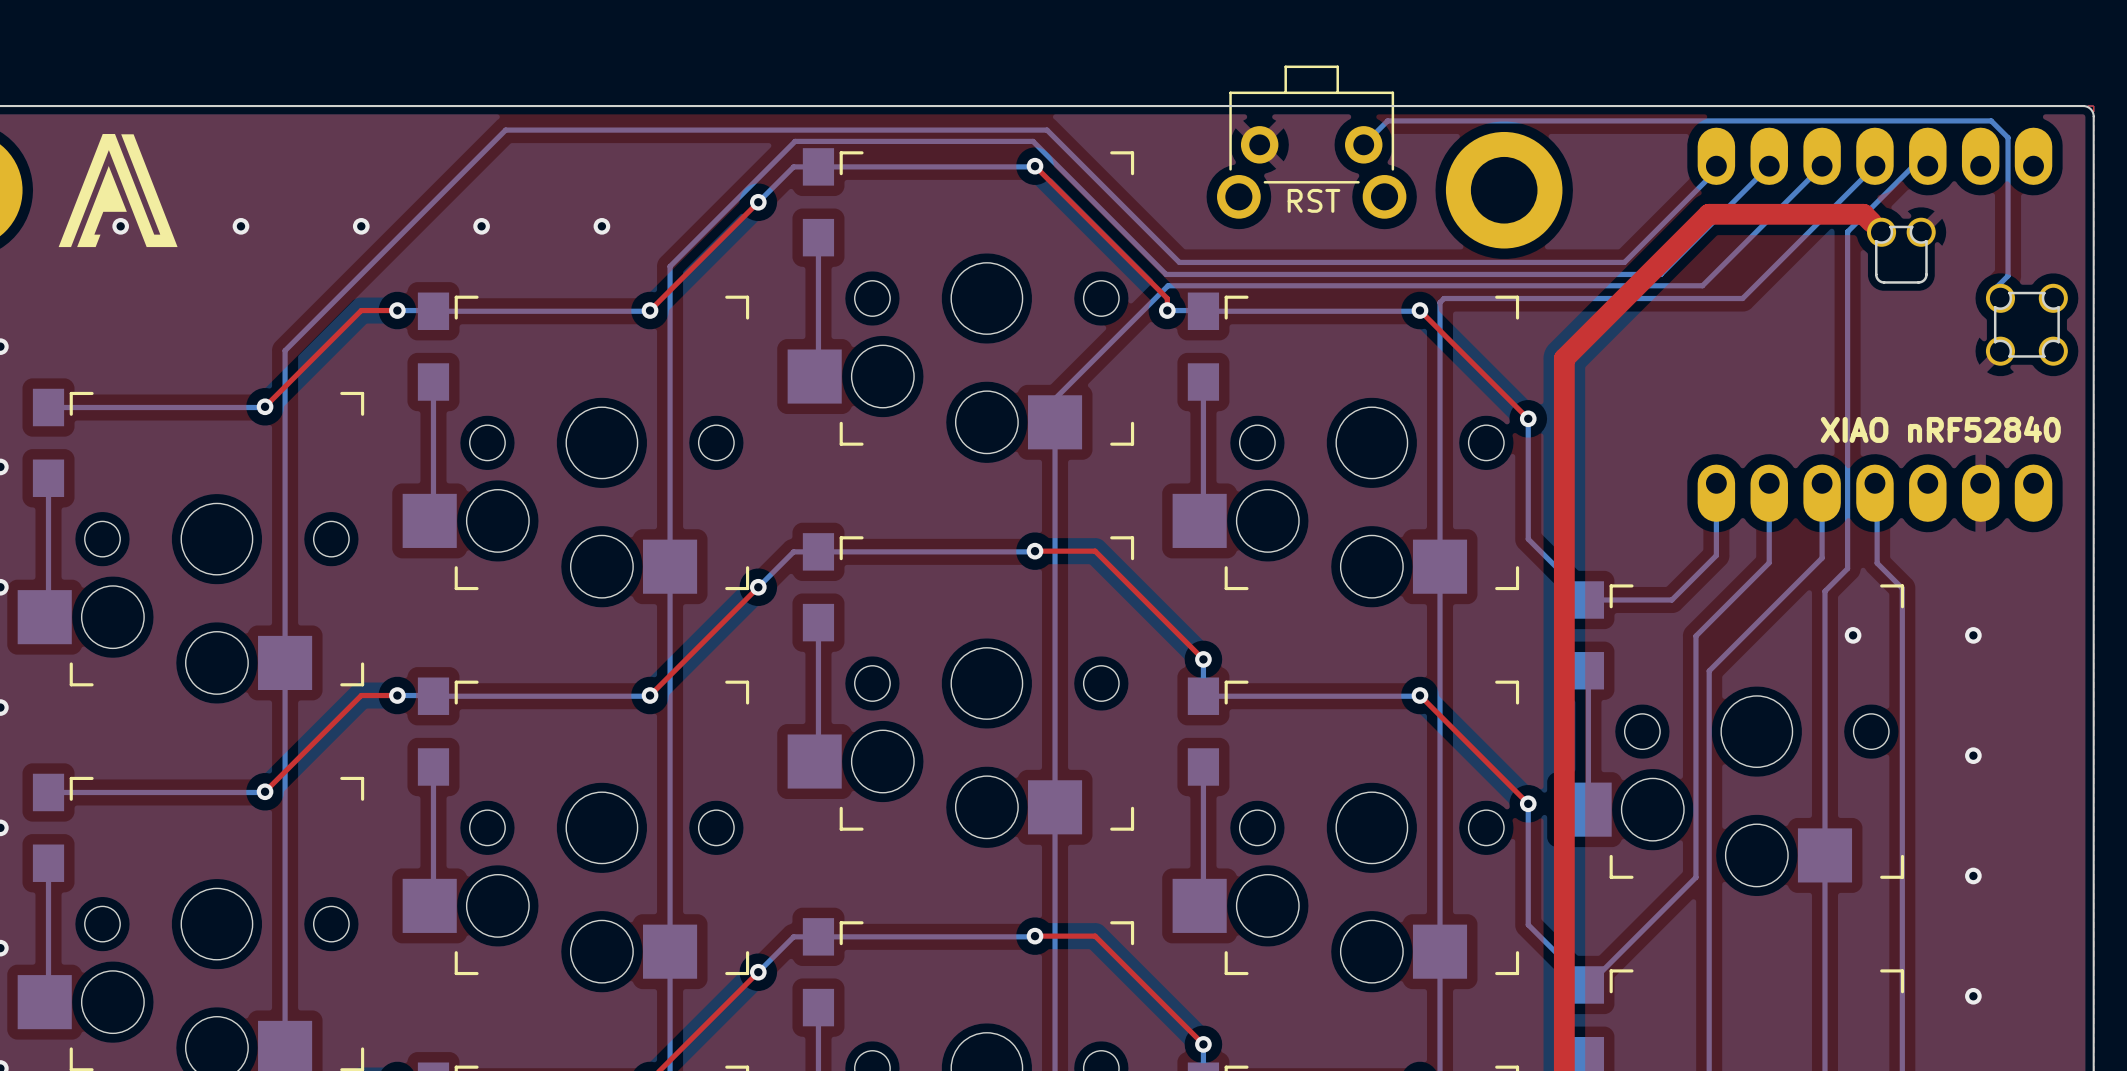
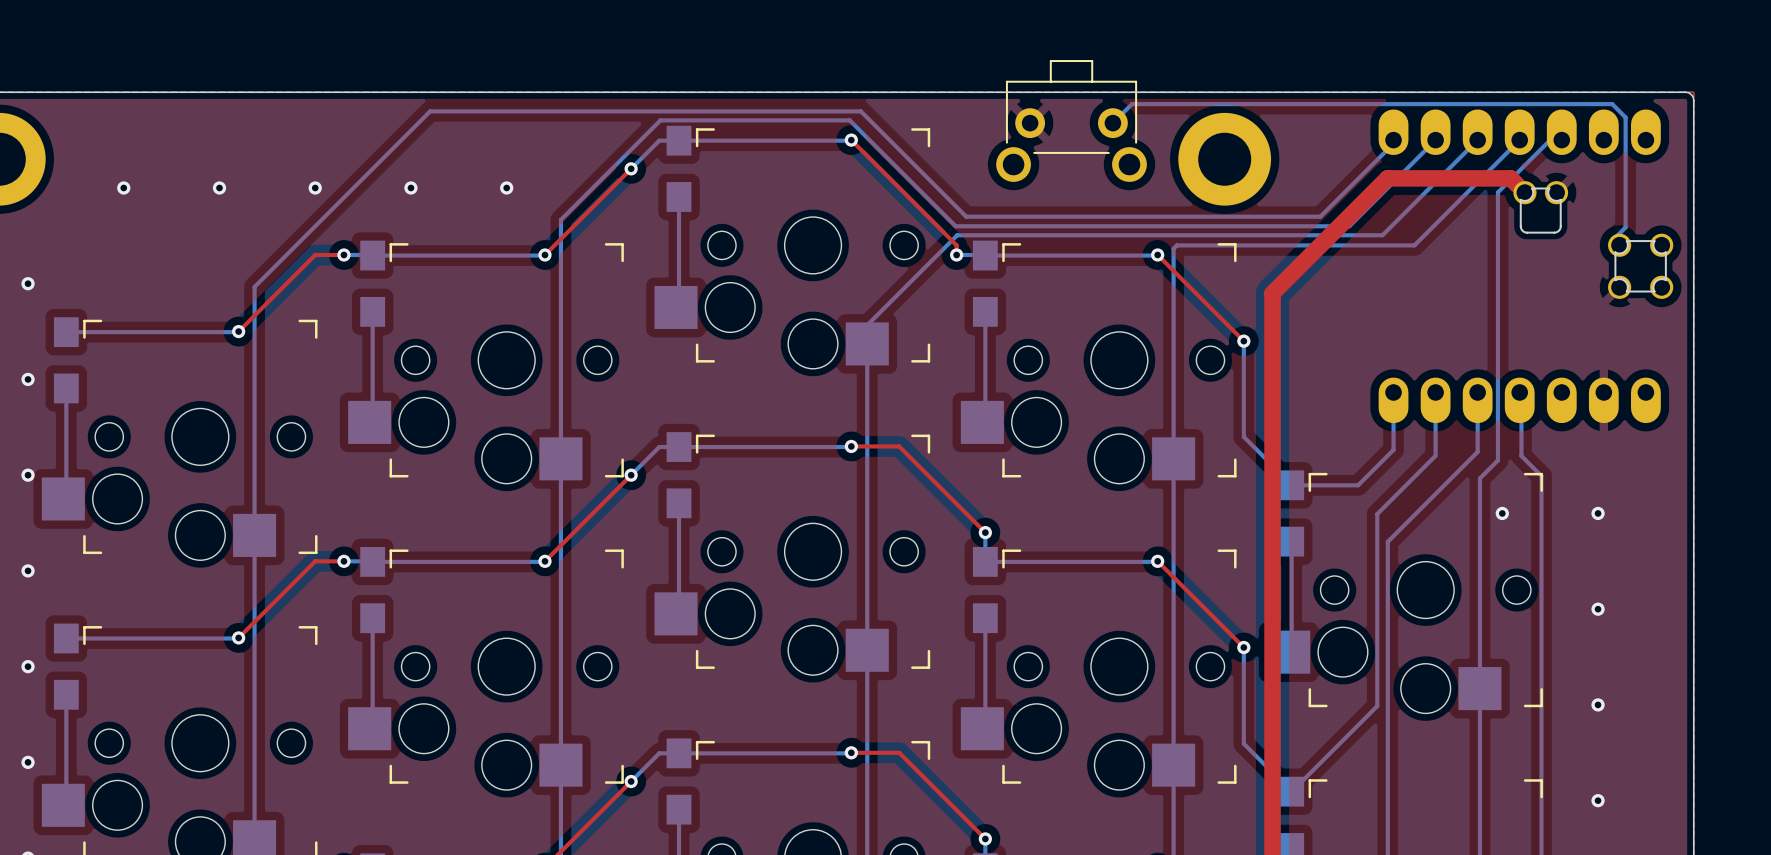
drawing: [58, 134, 178, 248] -> none
text: RST (1313, 200) -> none
text: XIAO nRF52840 (1940, 429) -> none

